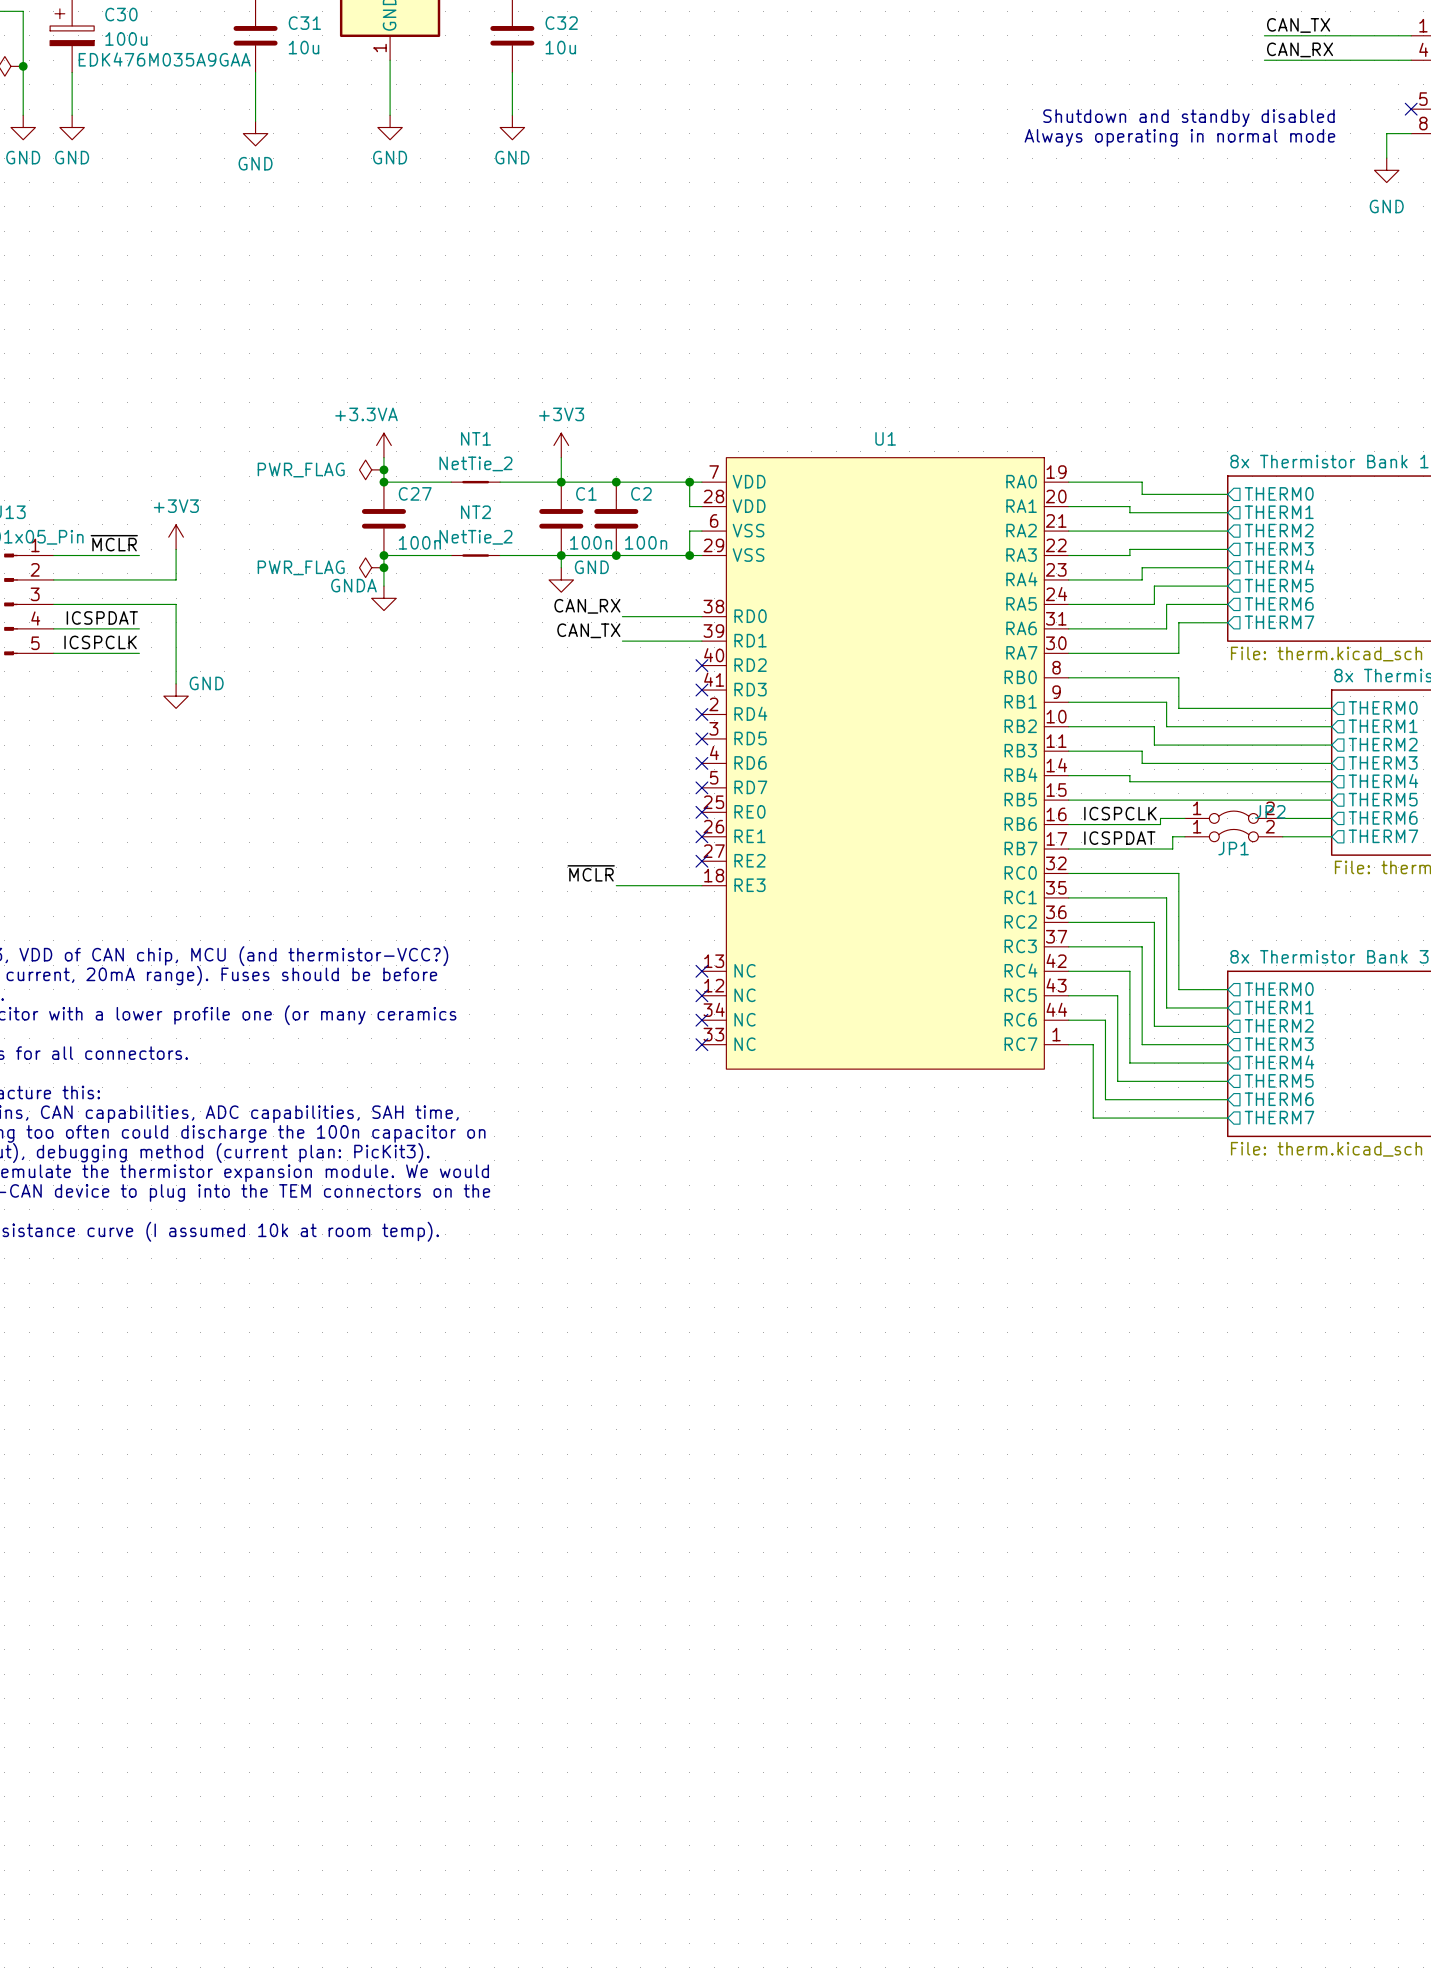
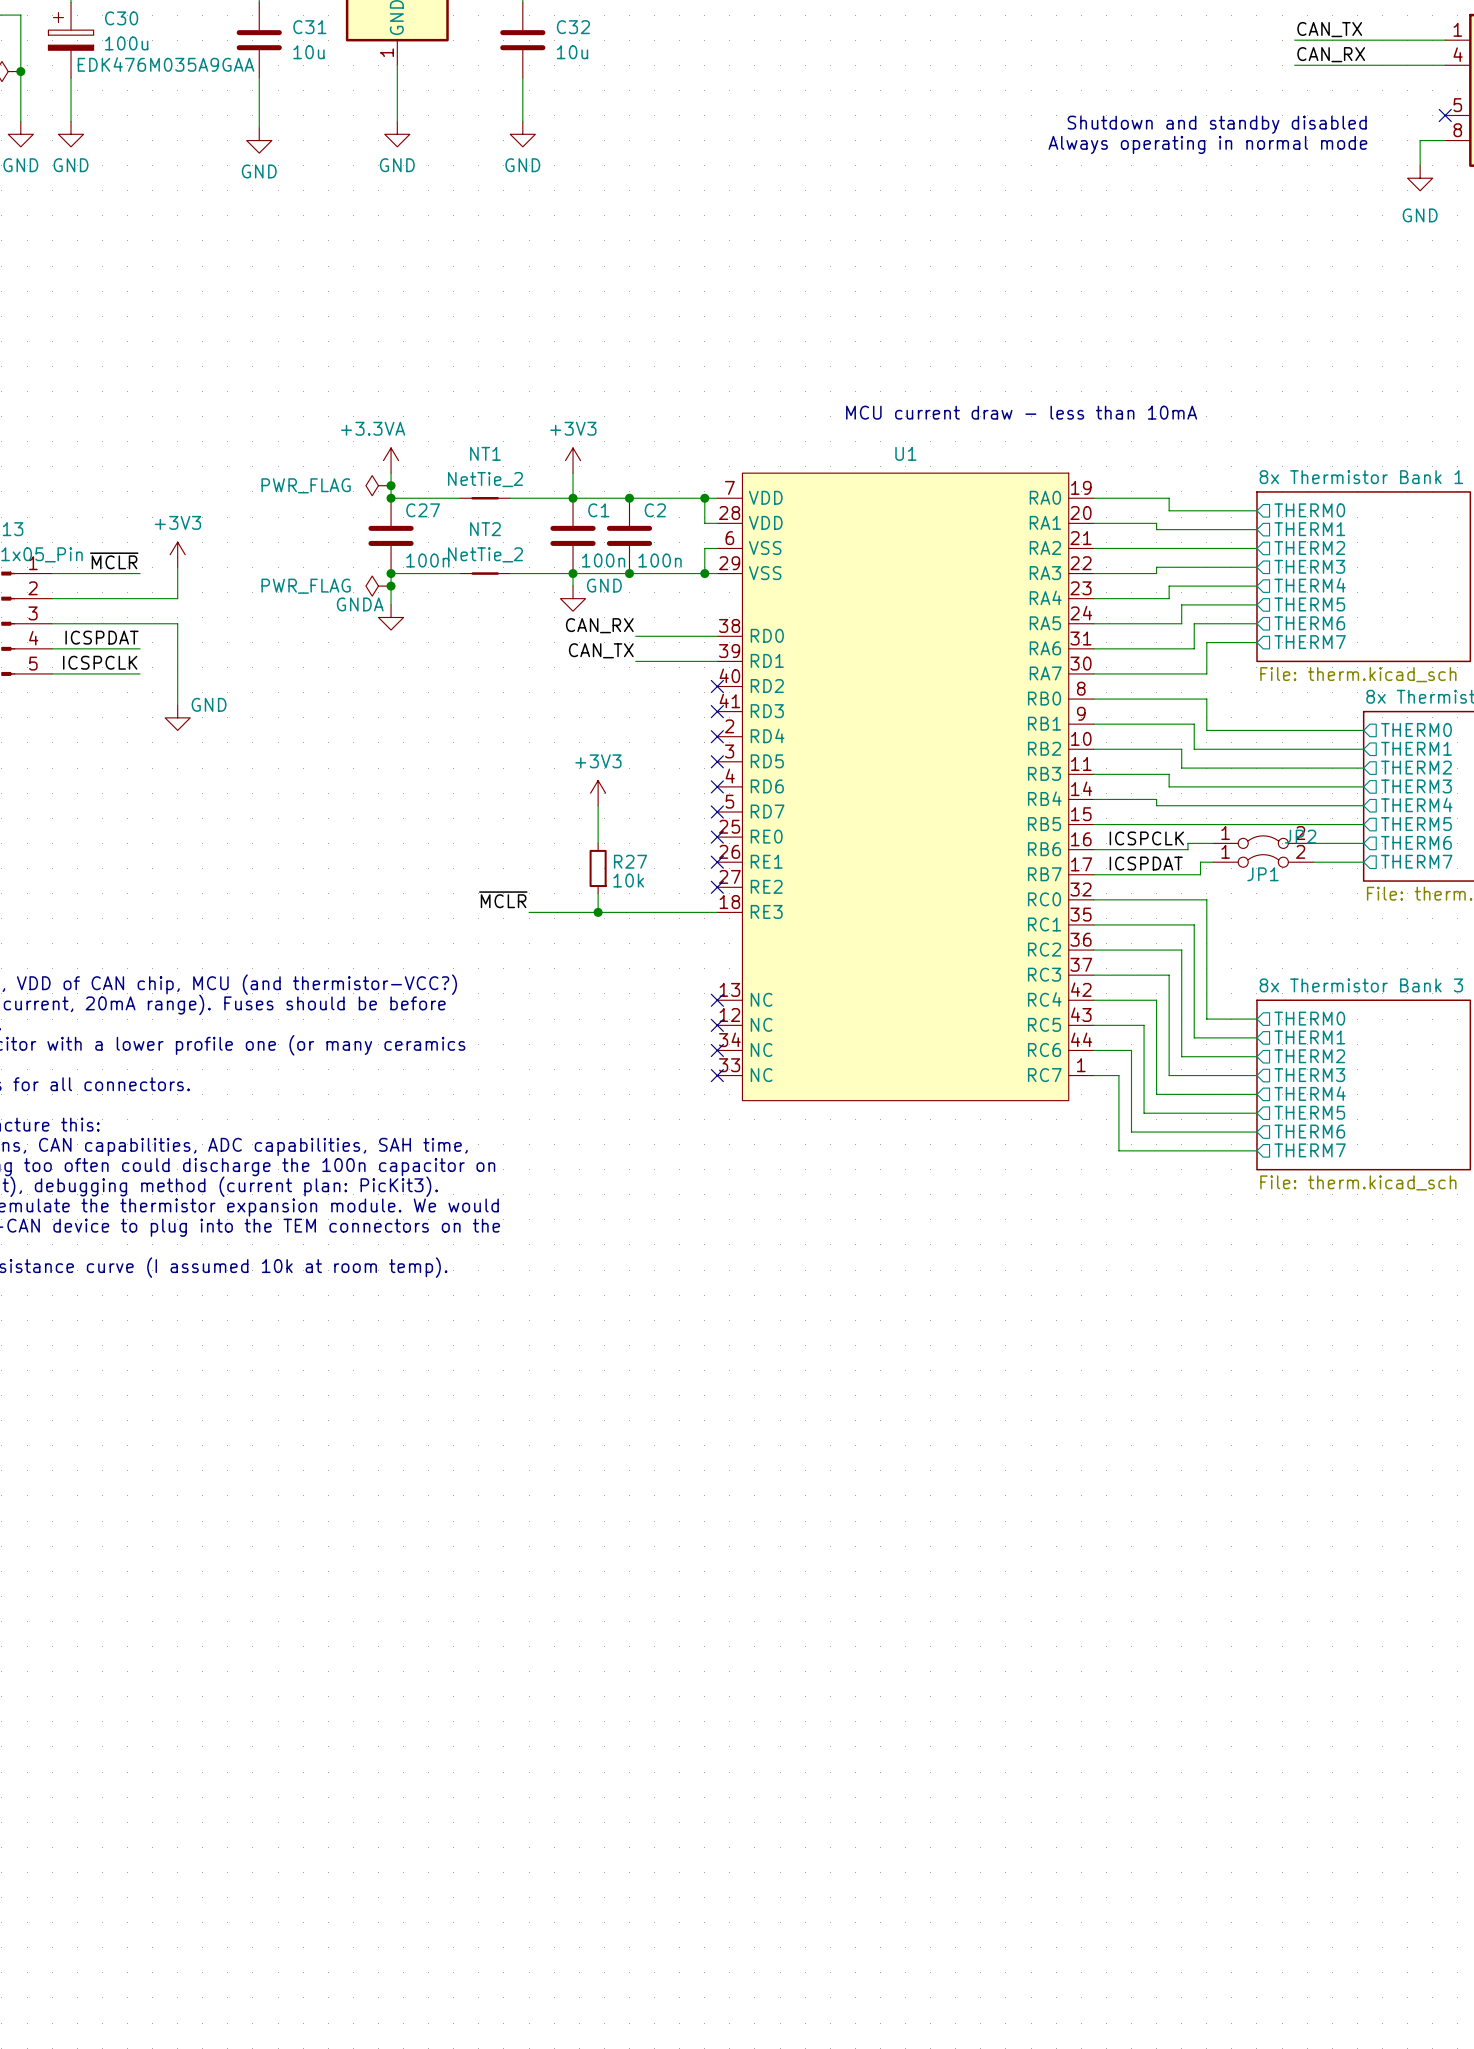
text: none -> MCU current draw - less than 10mA (1021, 412)
power symbol: none -> +3V3 (598, 793)
wire: none -> (598, 805) (598, 843)
R27: none -> 10k (598, 868)
wire: none -> (598, 893) (598, 912)
label position: ~{MCLR} (591, 873) -> ~{MCLR} (503, 899)
wire: none -> (529, 912) (629, 912)
junction: none -> (598, 912)

